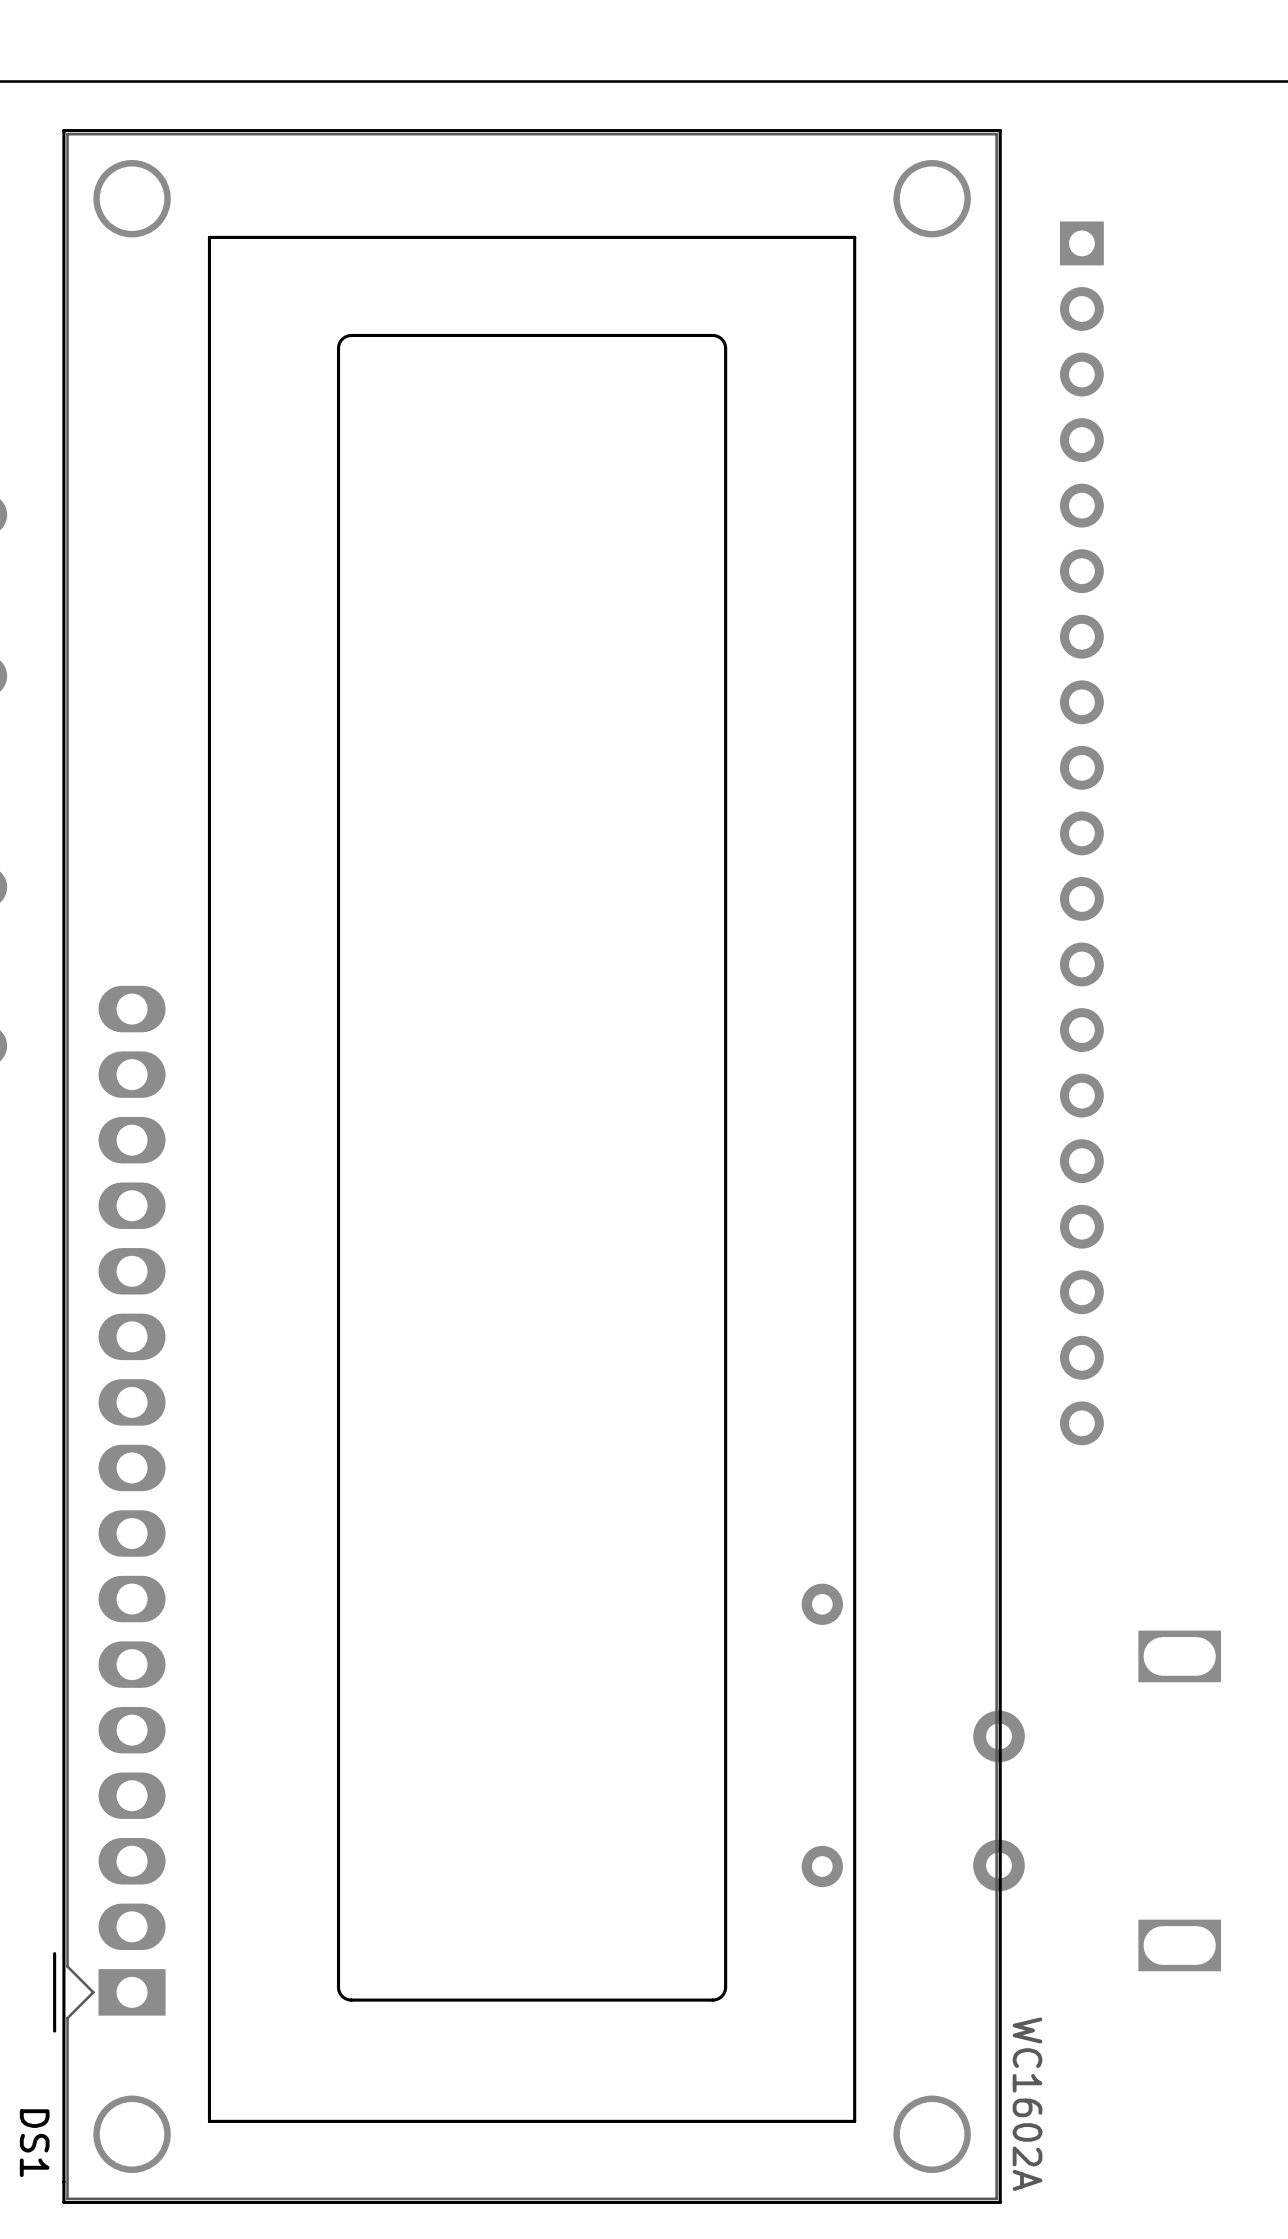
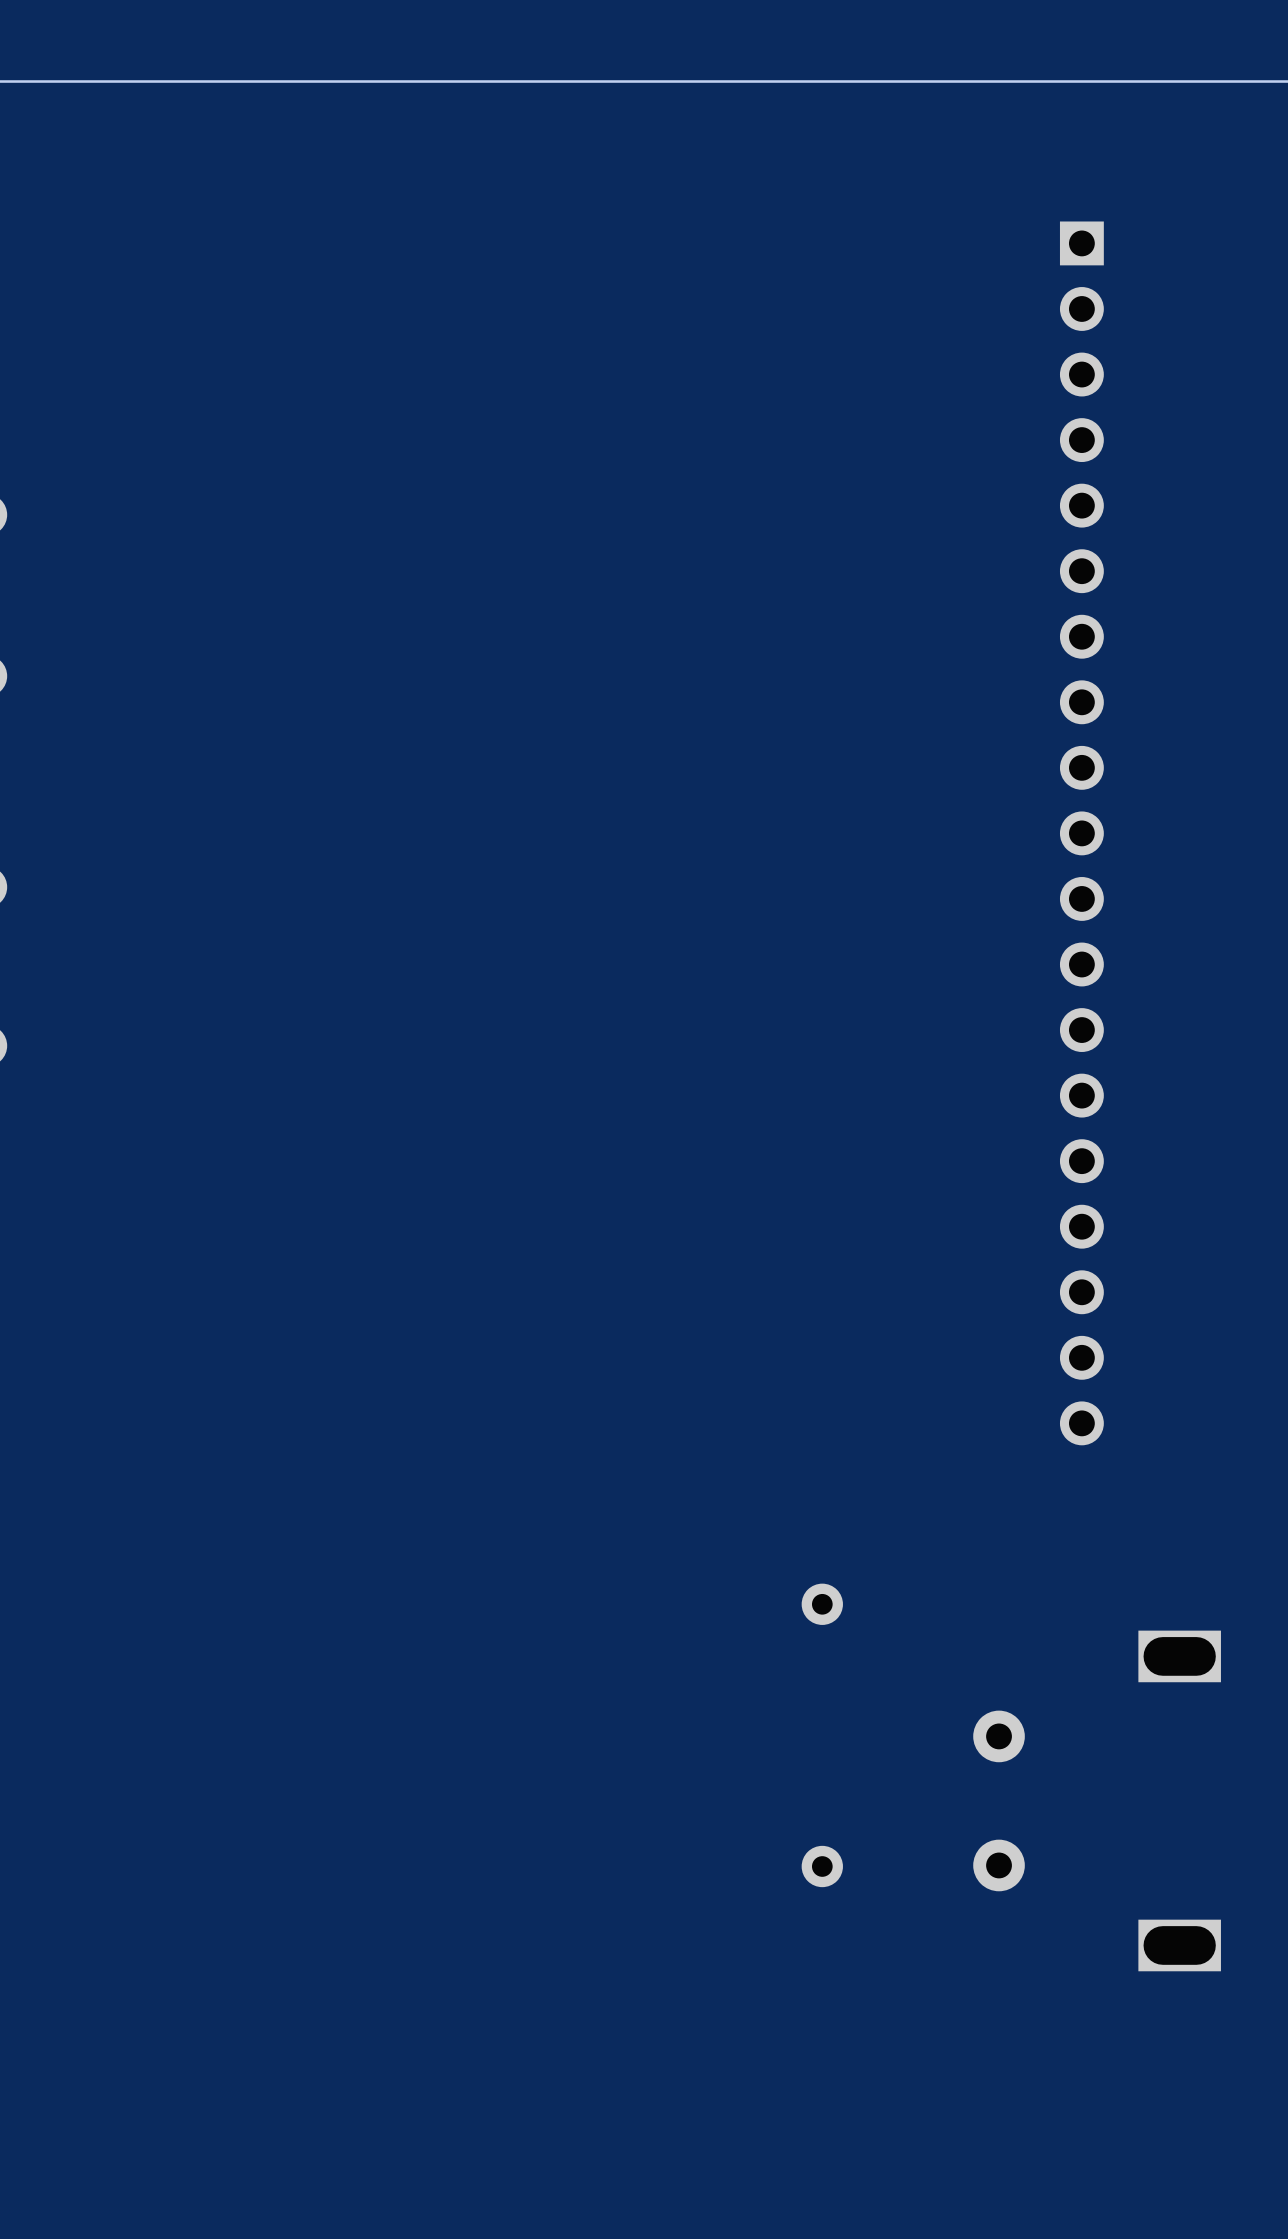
DS1: WC1602A (527, 1166) -> none

